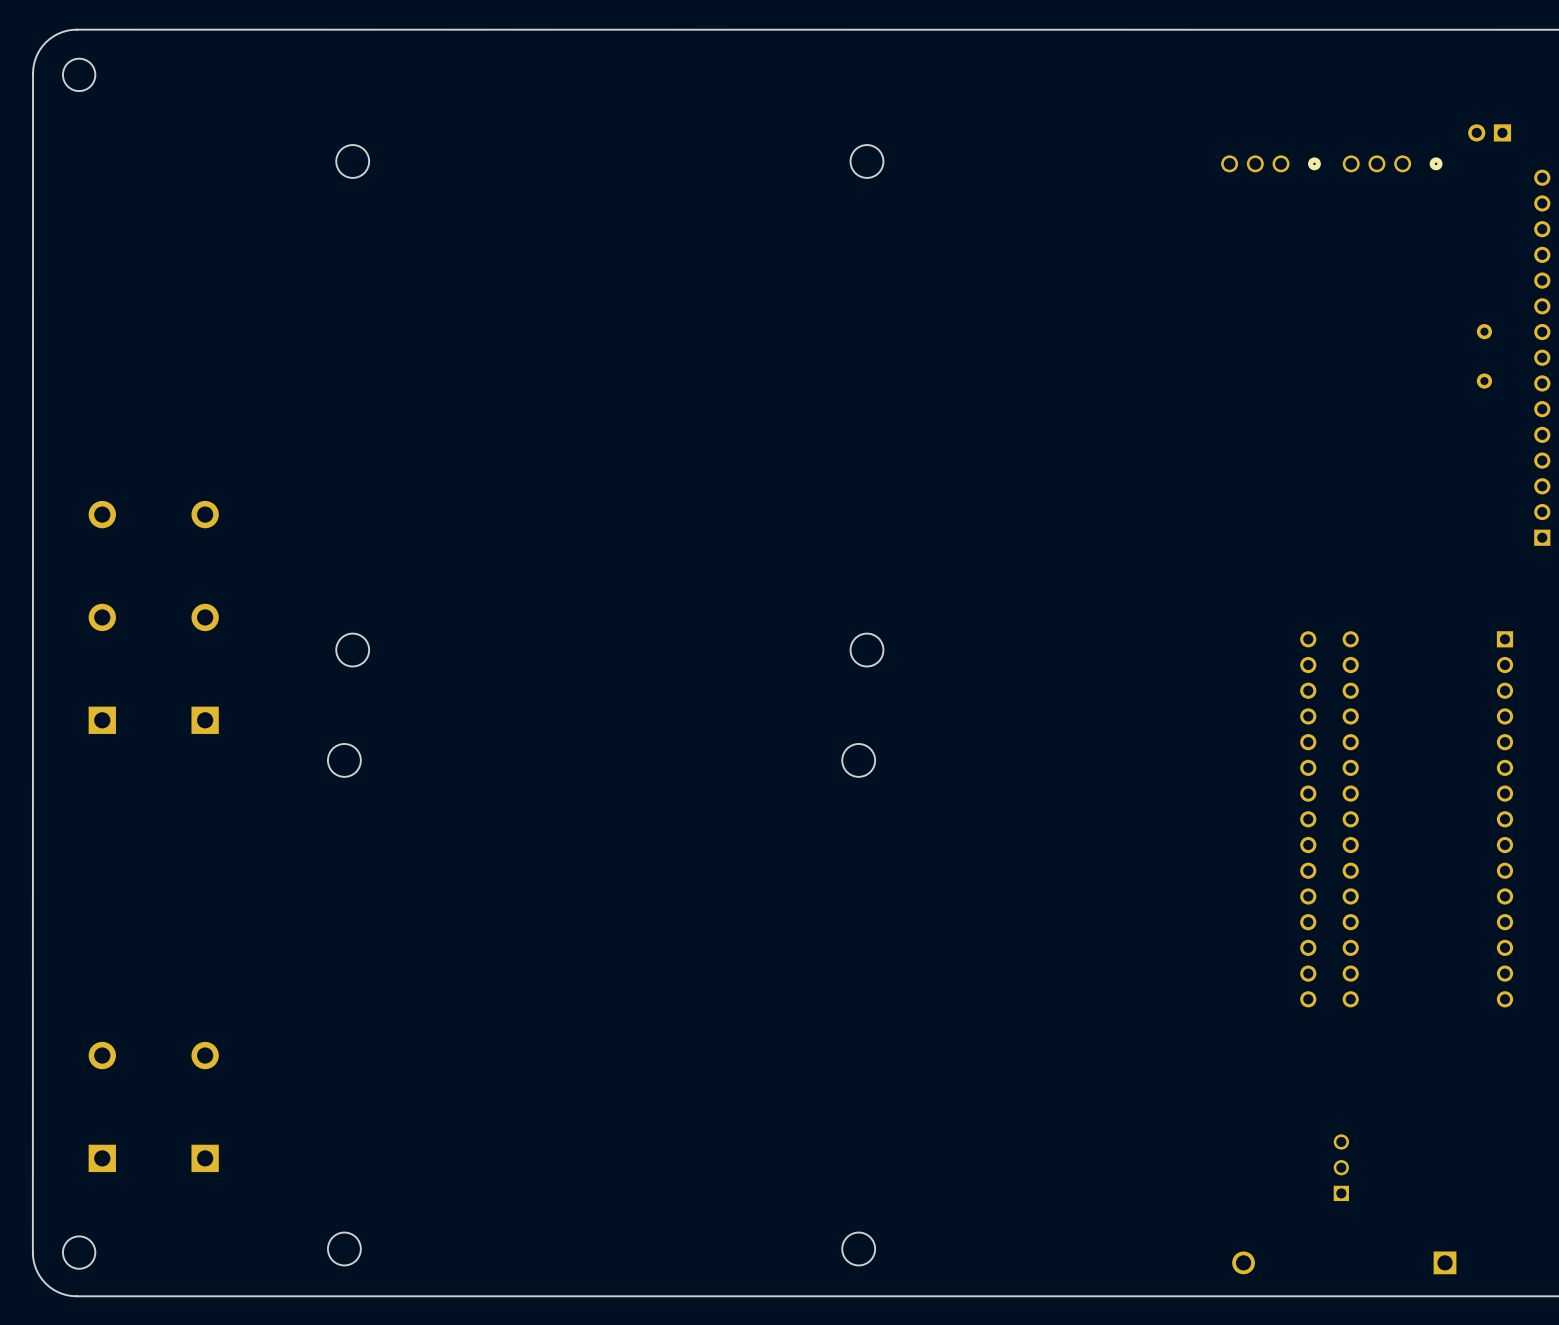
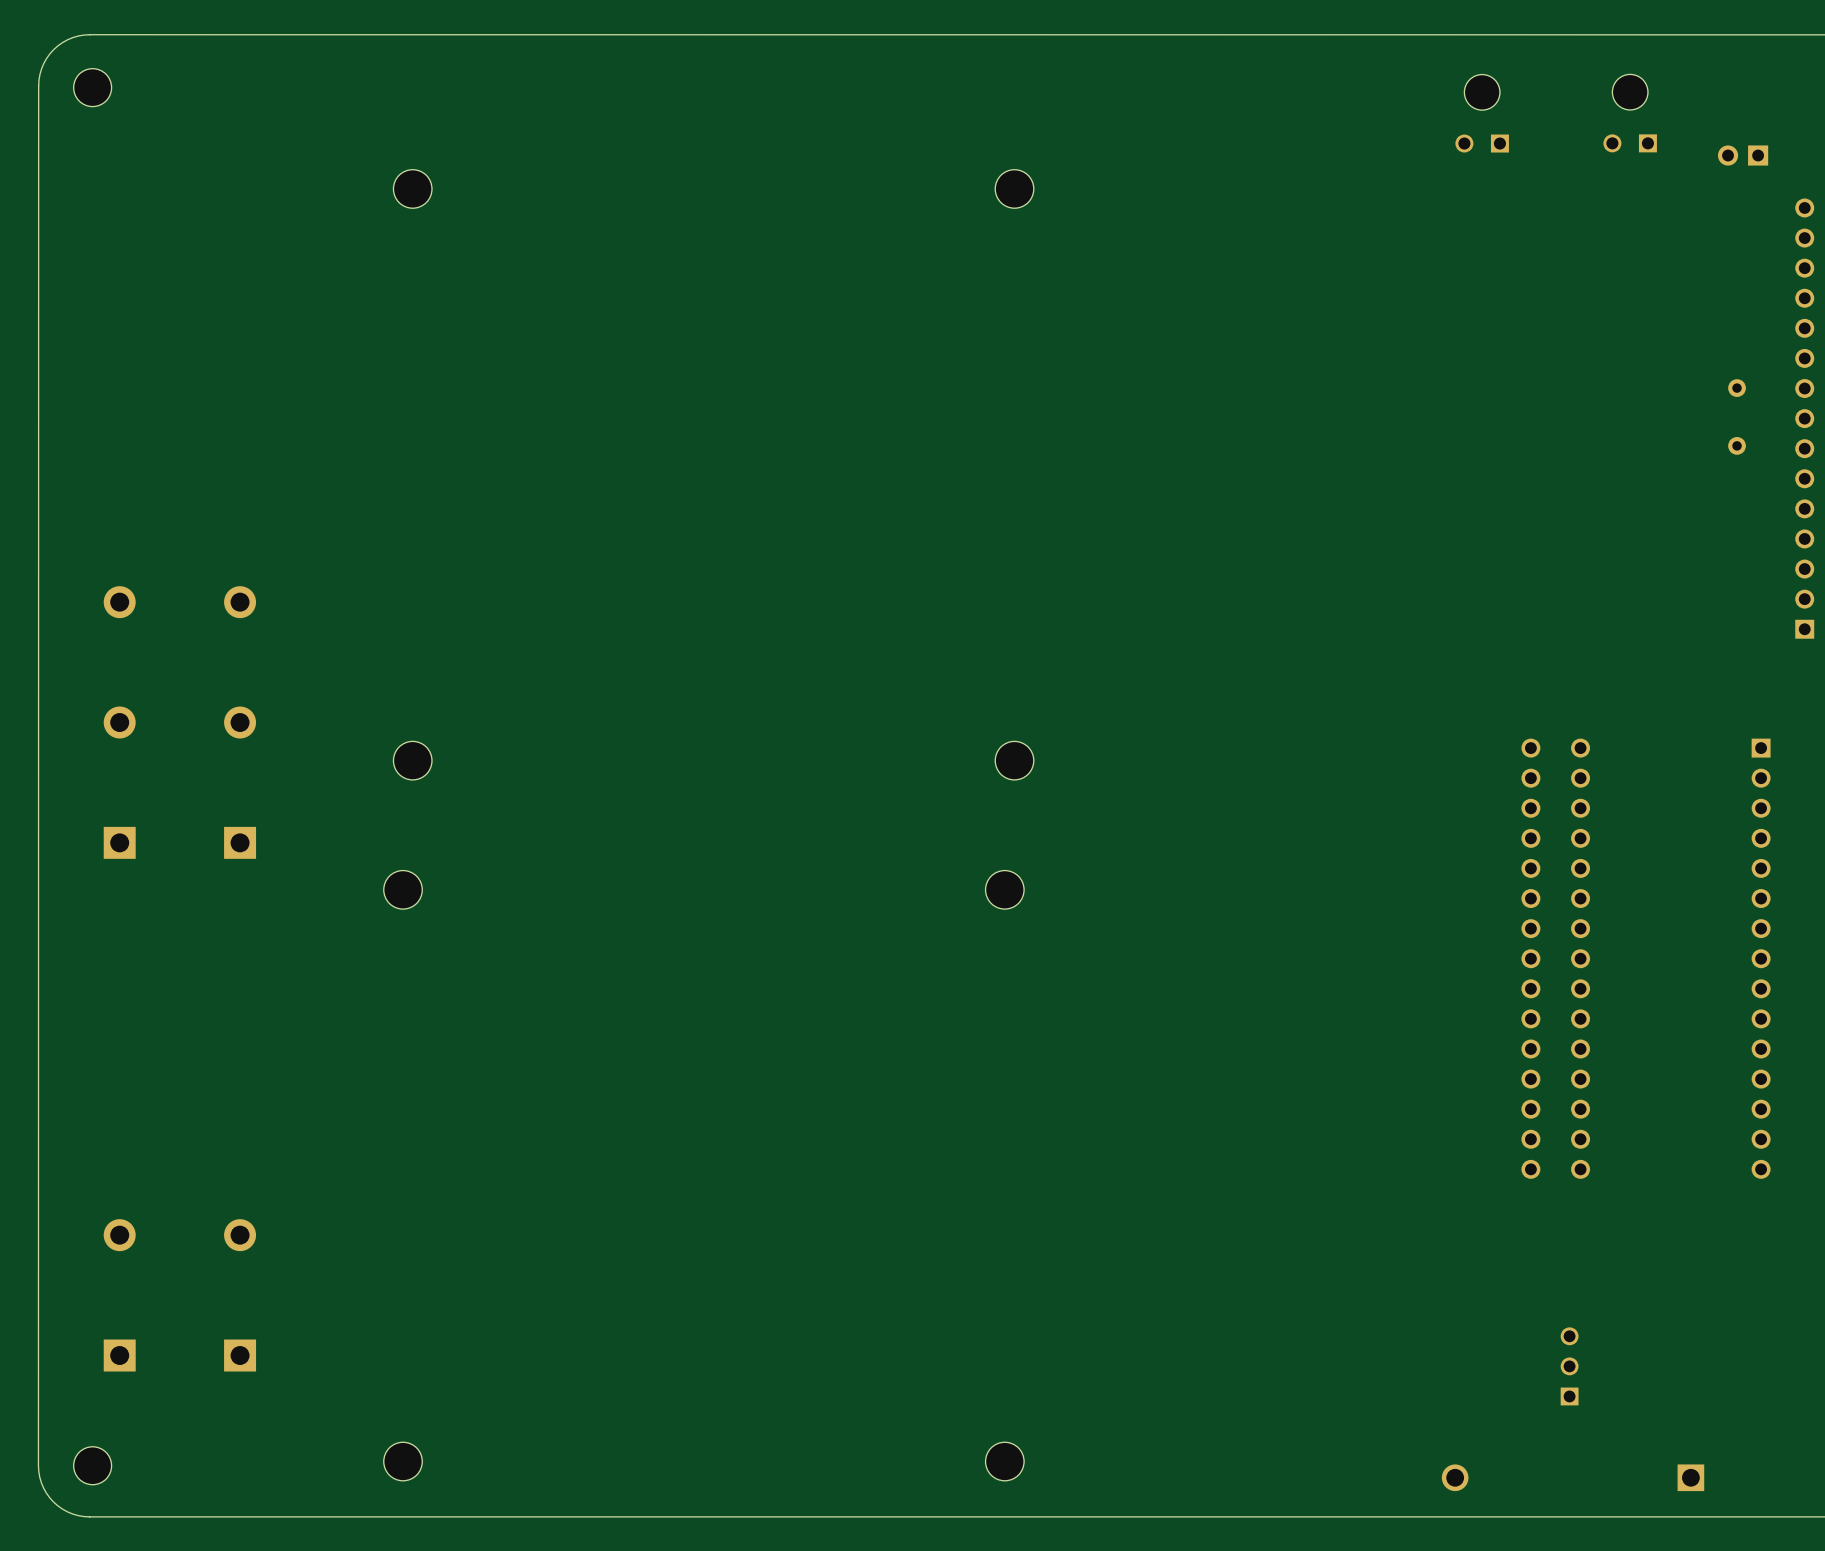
part: none -> (1630, 113)
part: none -> (1482, 113)
part: (1271, 163) -> none
part: (1392, 163) -> none

